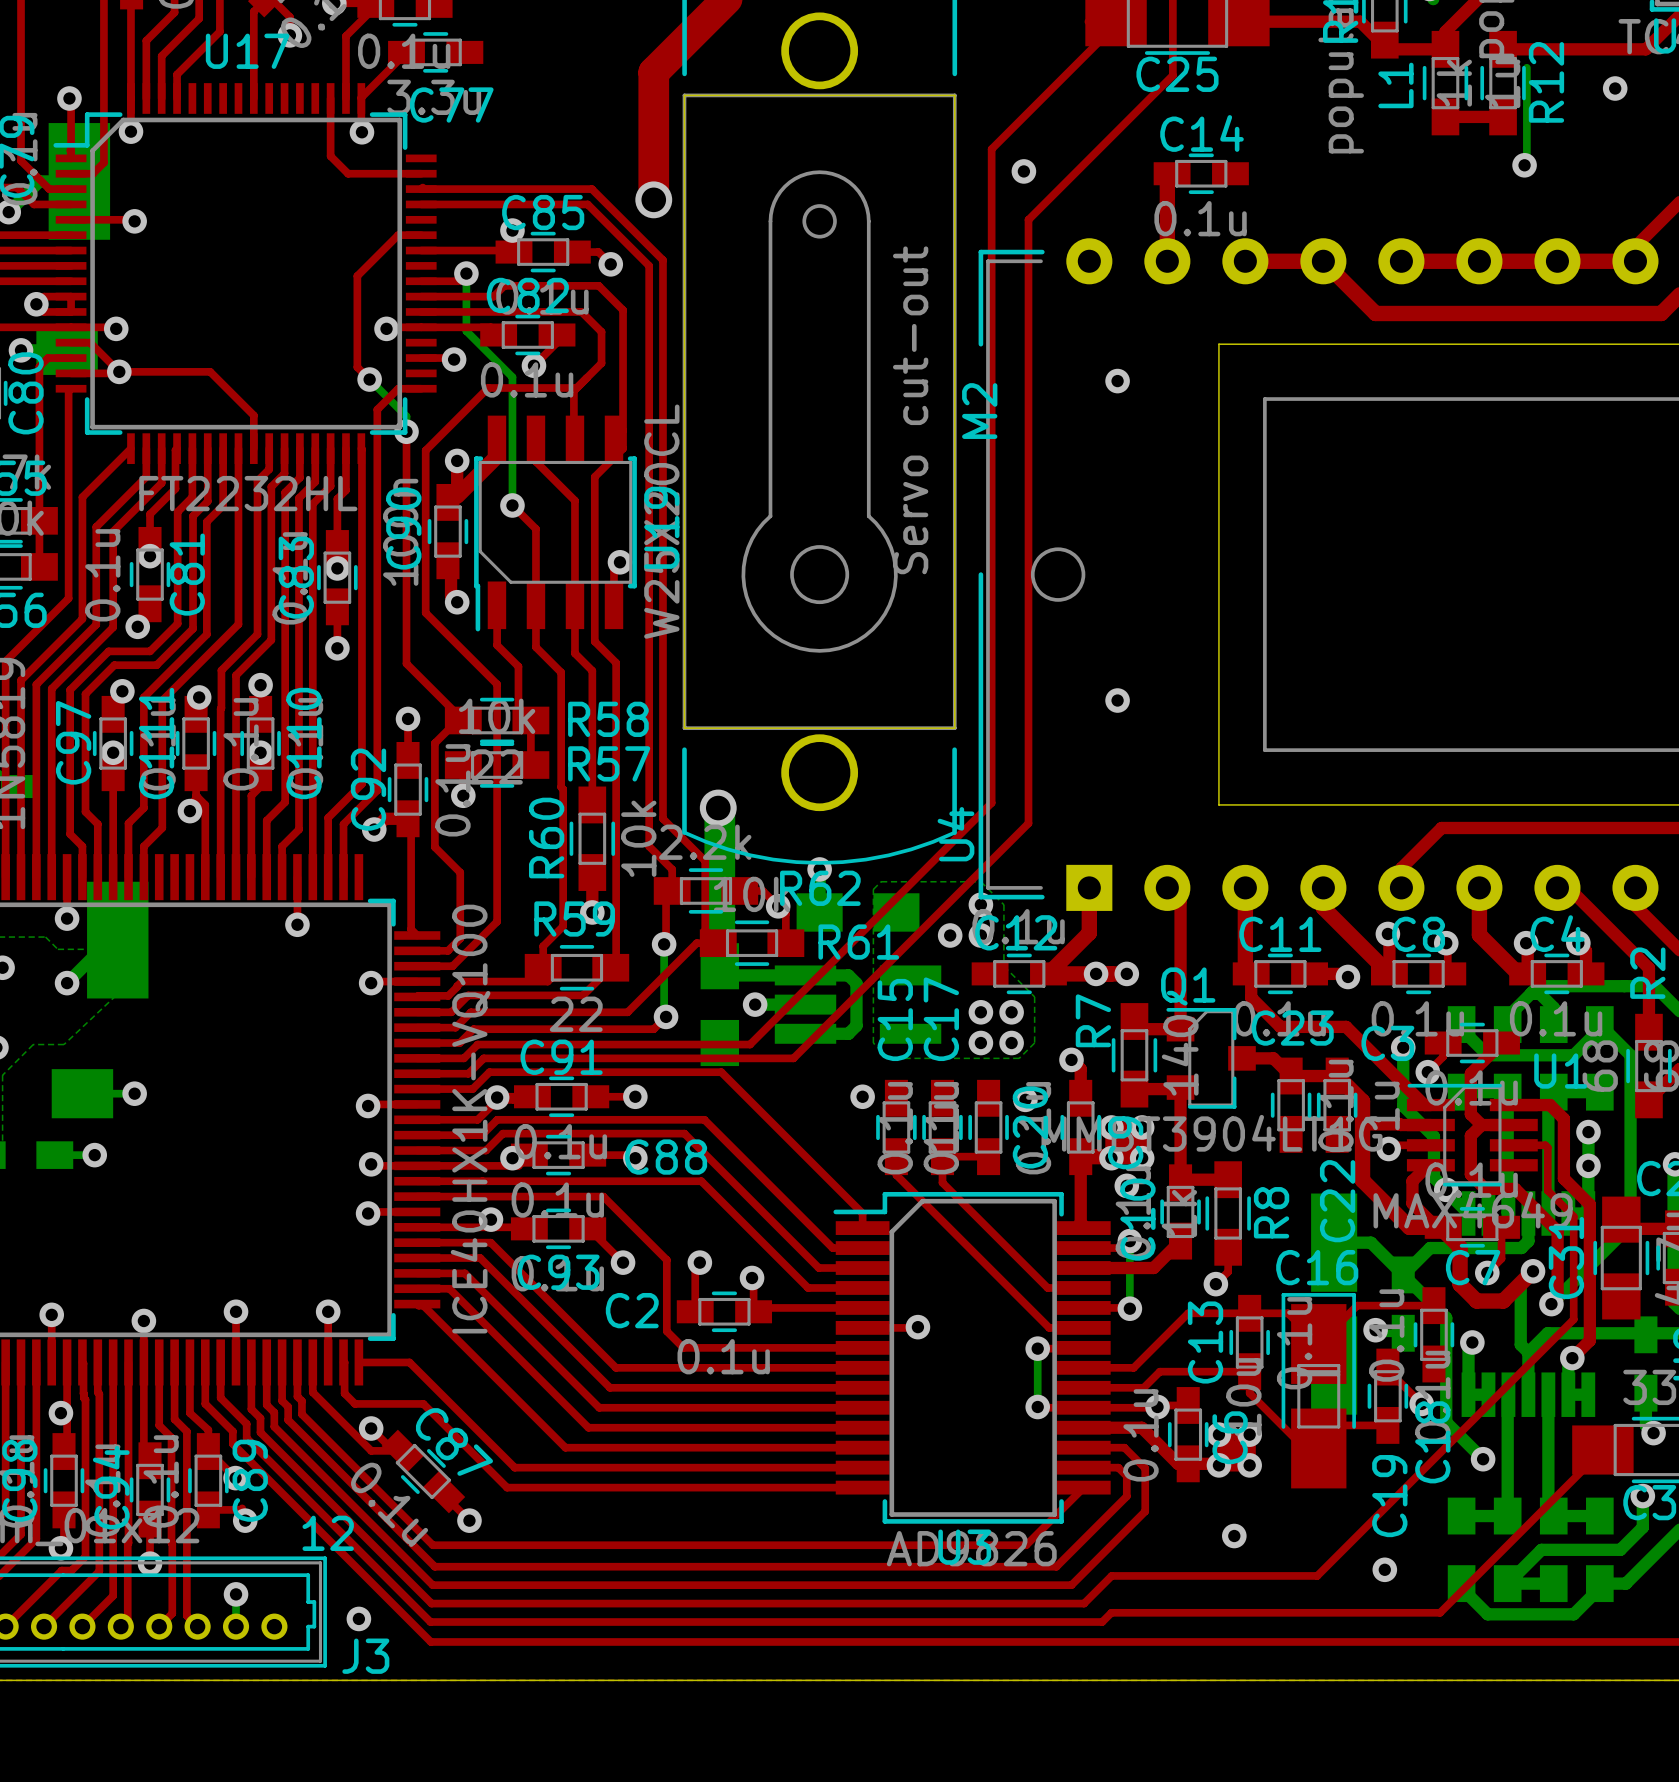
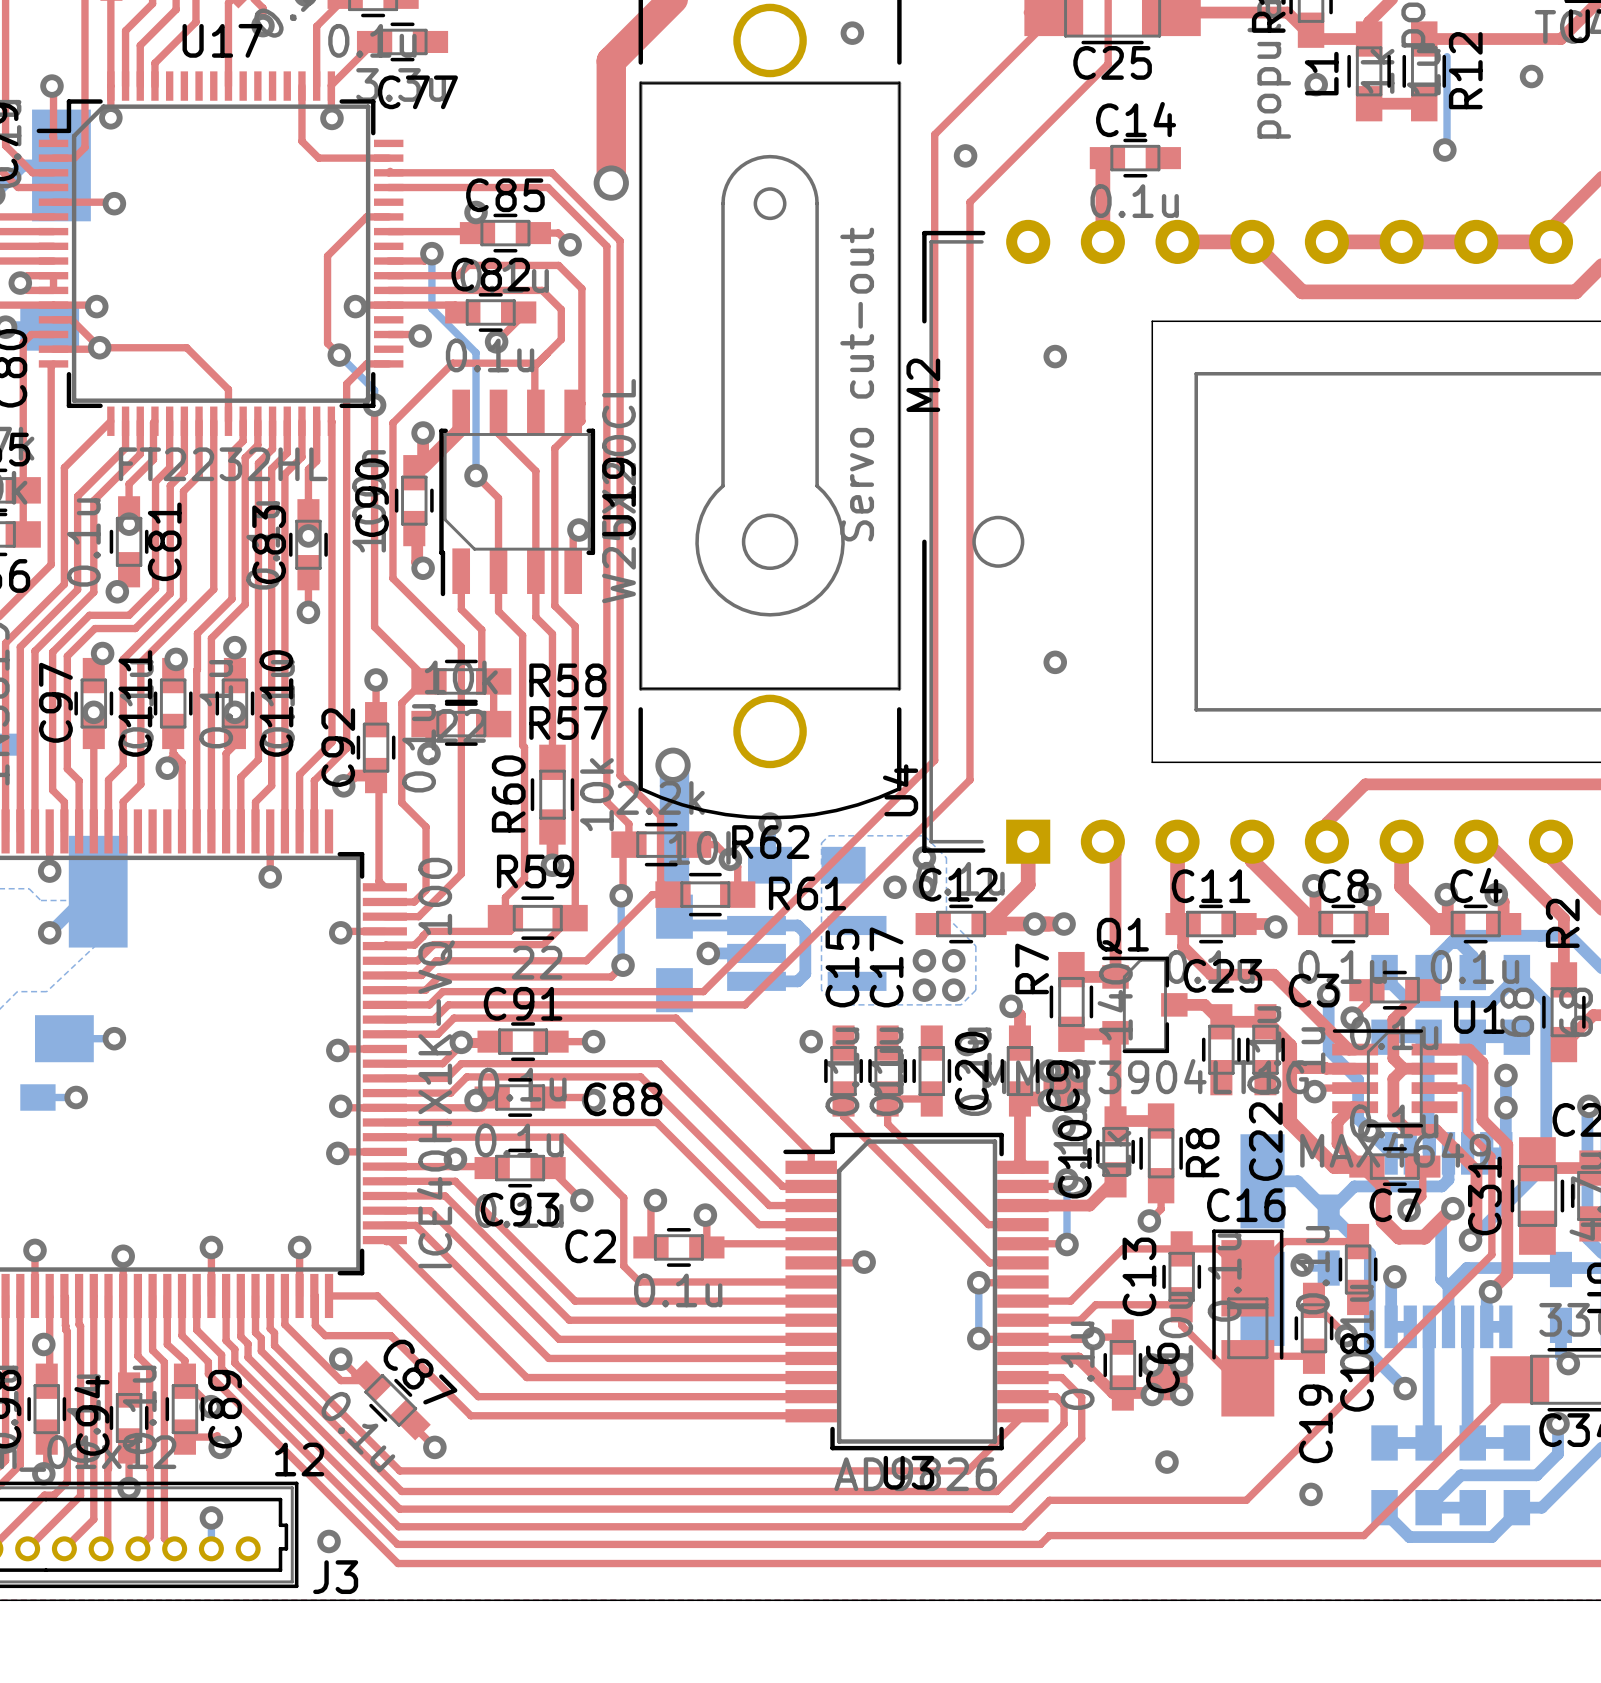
via: none -> (852, 33)
via: none -> (1316, 84)

